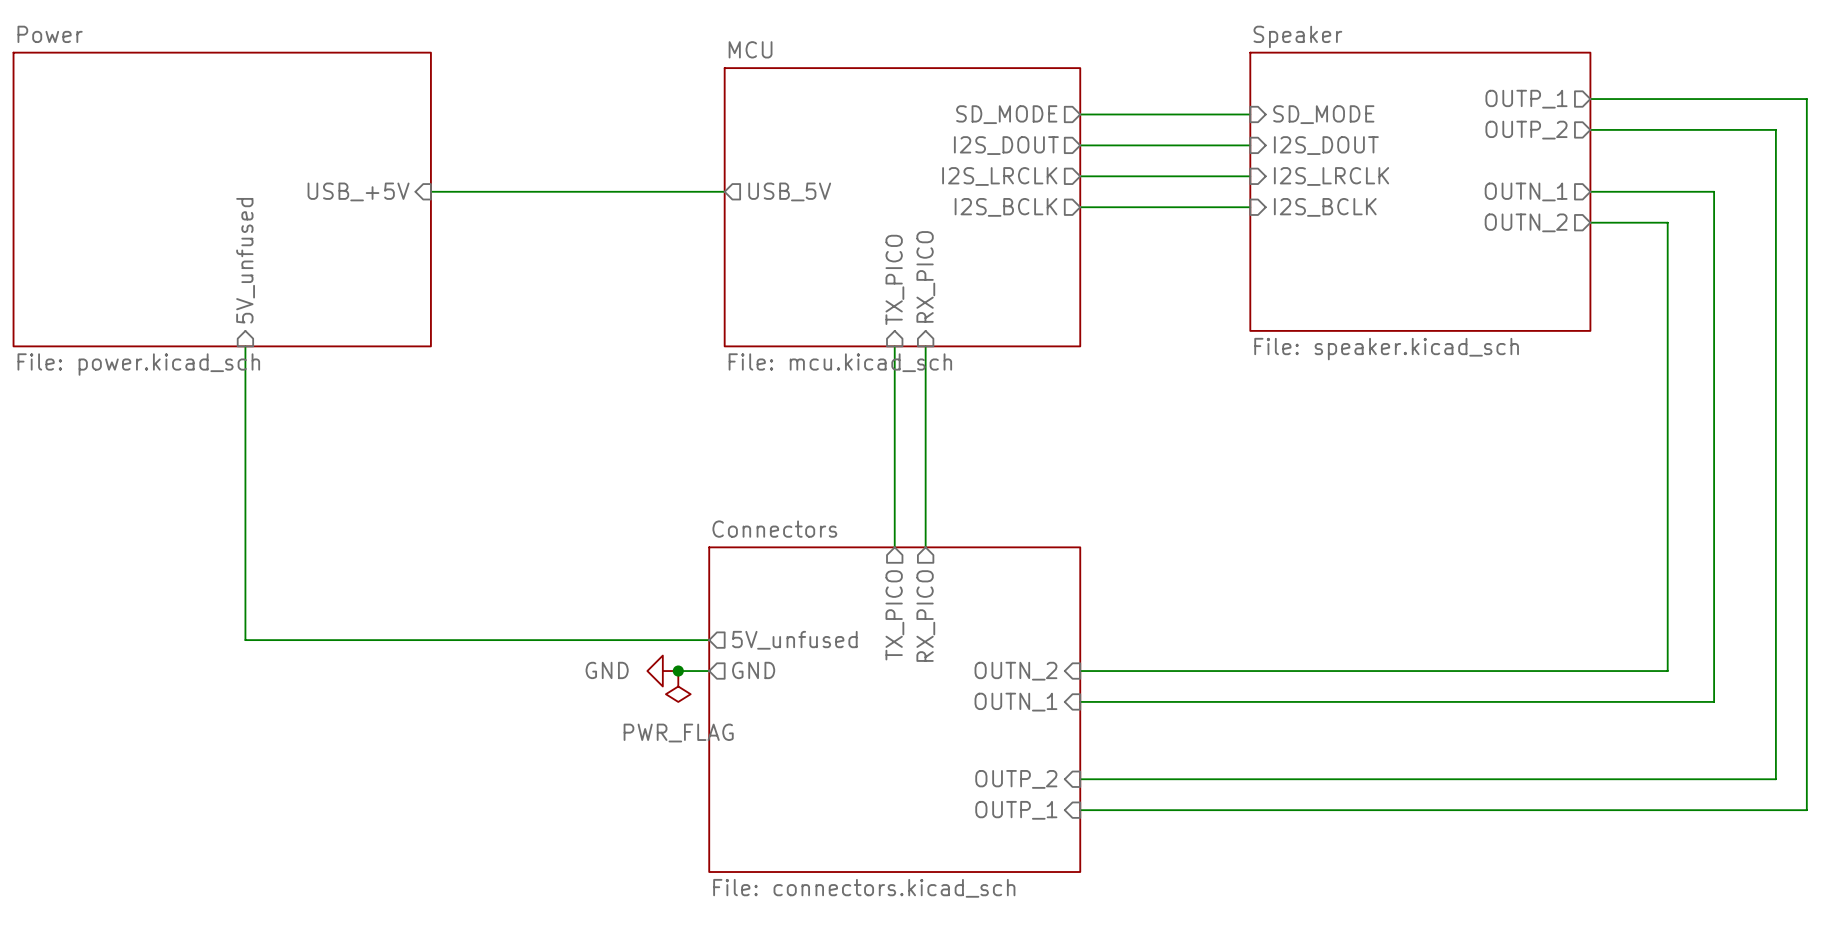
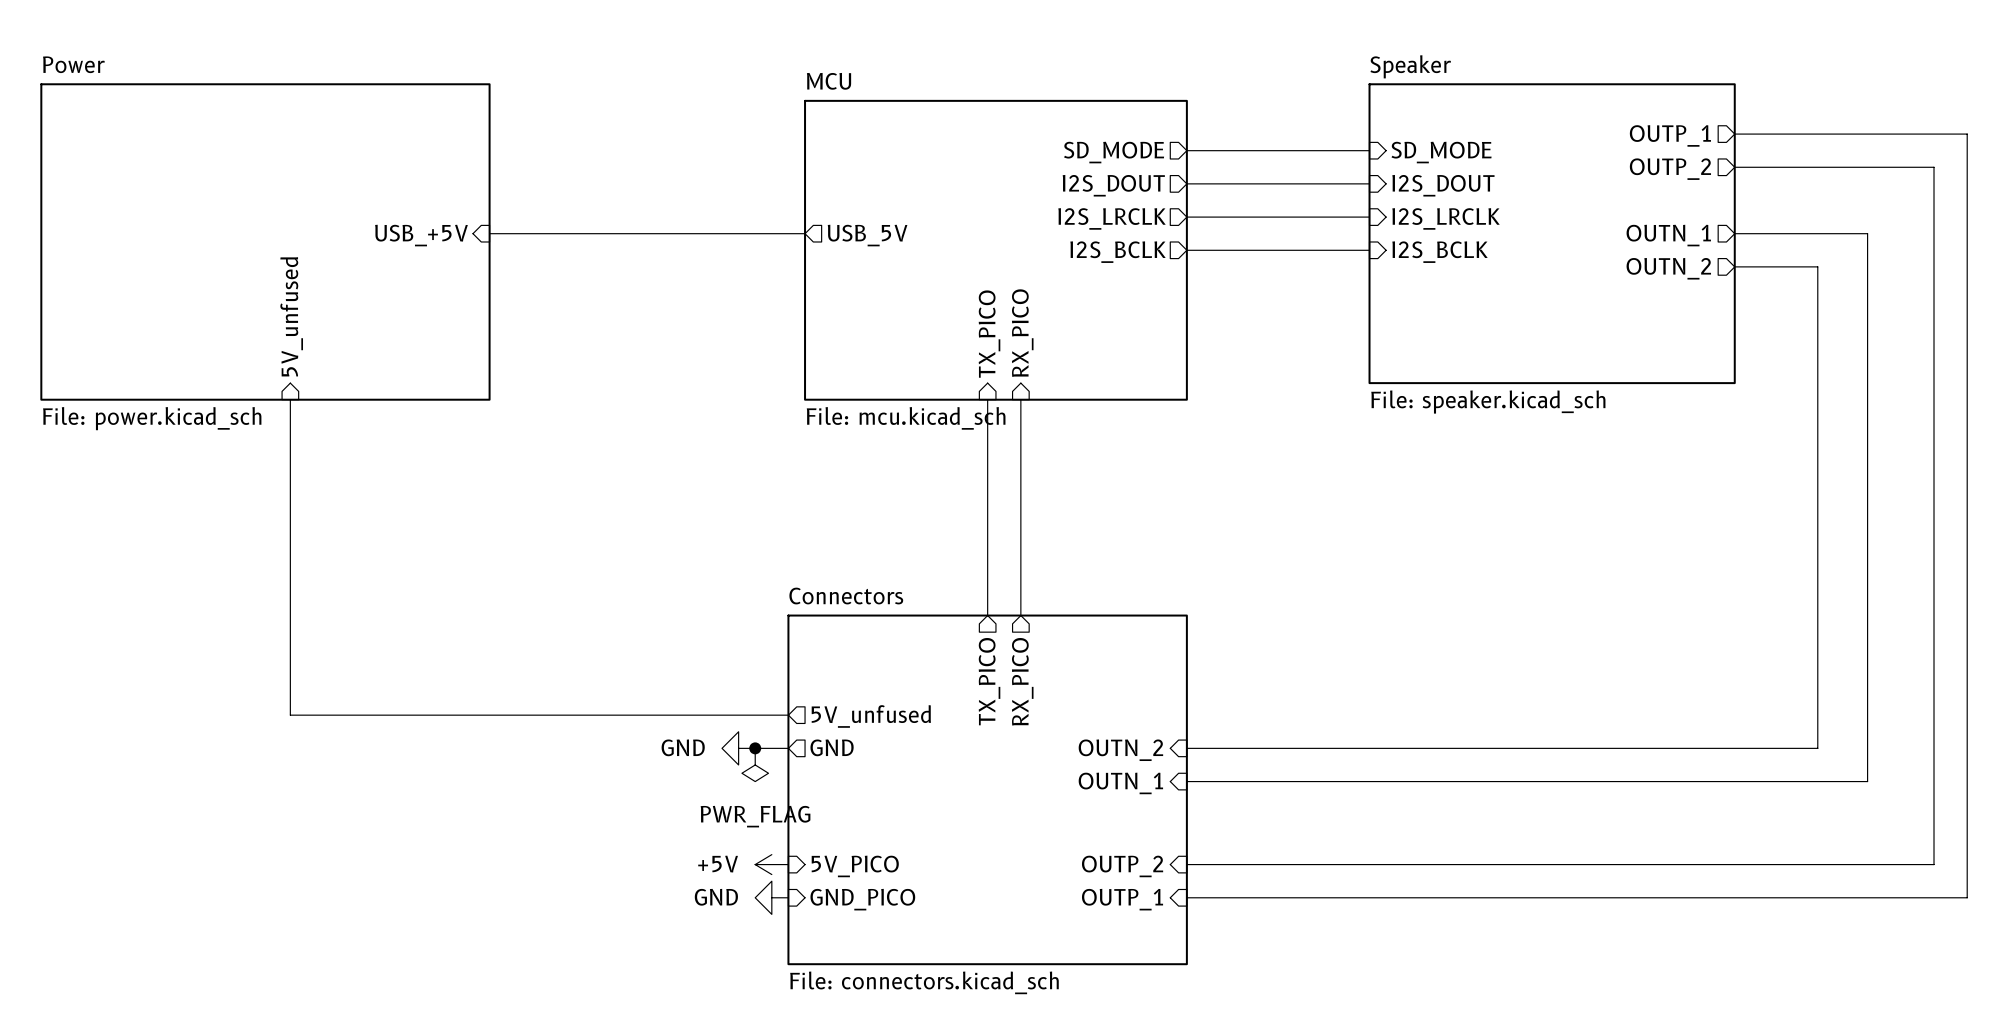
power symbol: none -> +5V (771, 864)
sheet pin: none -> 5V_PICO (855, 866)
power symbol: none -> GND (771, 897)
sheet pin: none -> GND_PICO (862, 899)

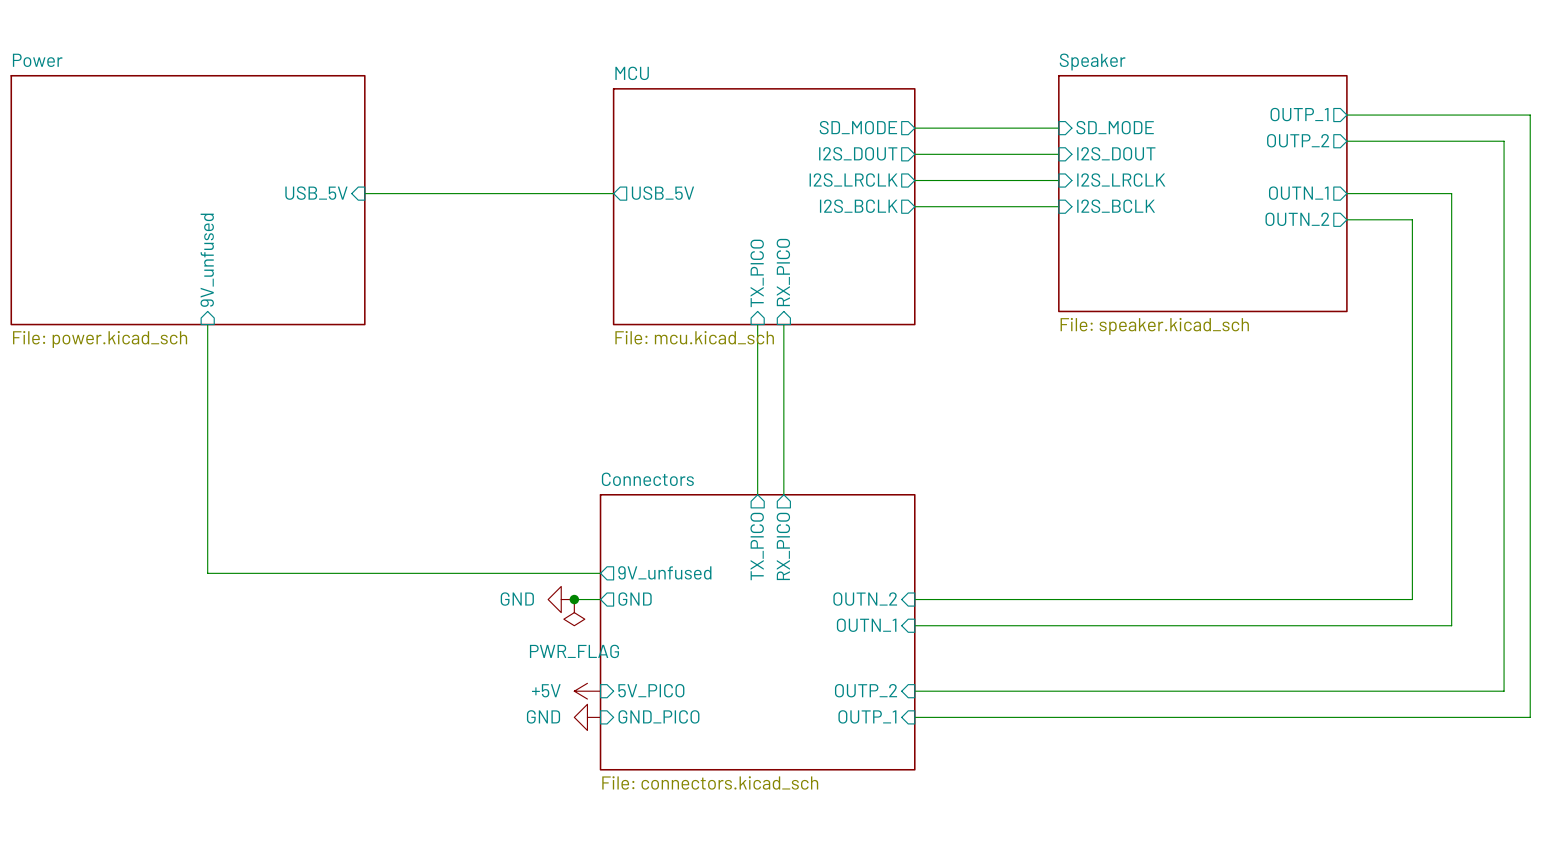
sheet pin: USB_+5V (421, 235) -> USB_5V (316, 193)
sheet pin: 5V_unfused (291, 316) -> 9V_unfused (207, 260)
sheet pin: 5V_unfused (871, 716) -> 9V_unfused (664, 572)

